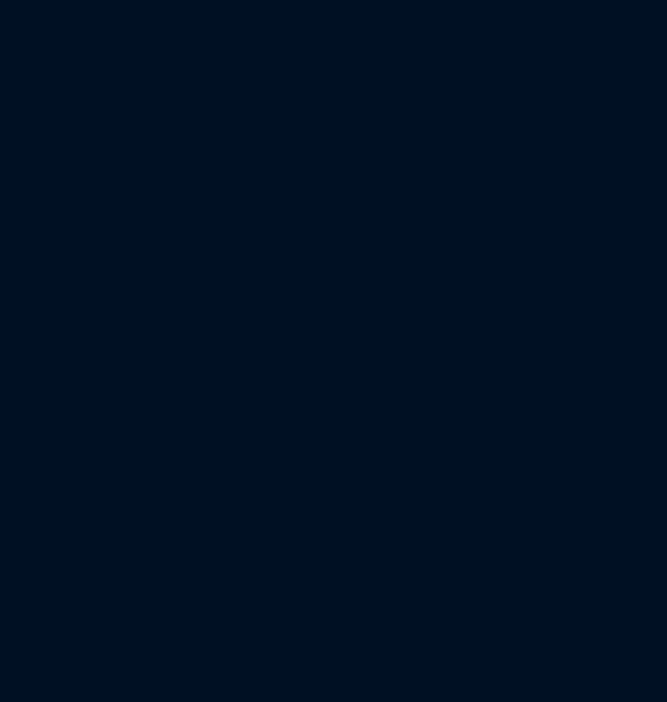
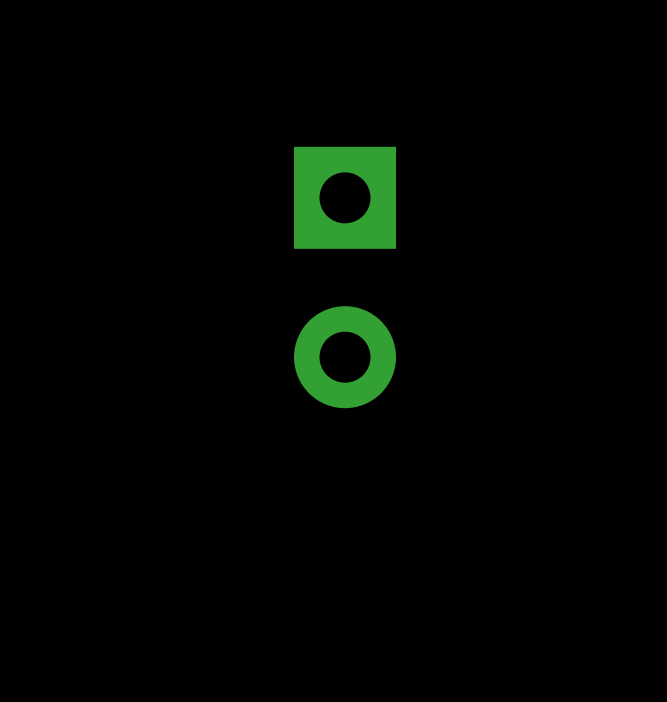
part: none -> (345, 277)

